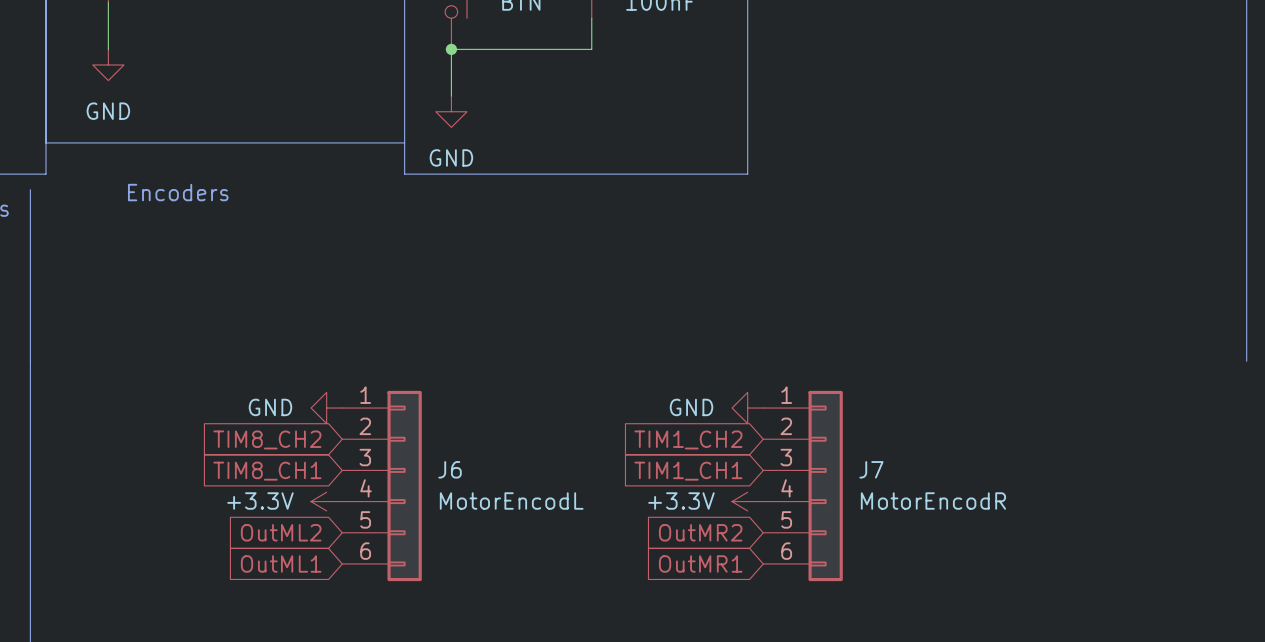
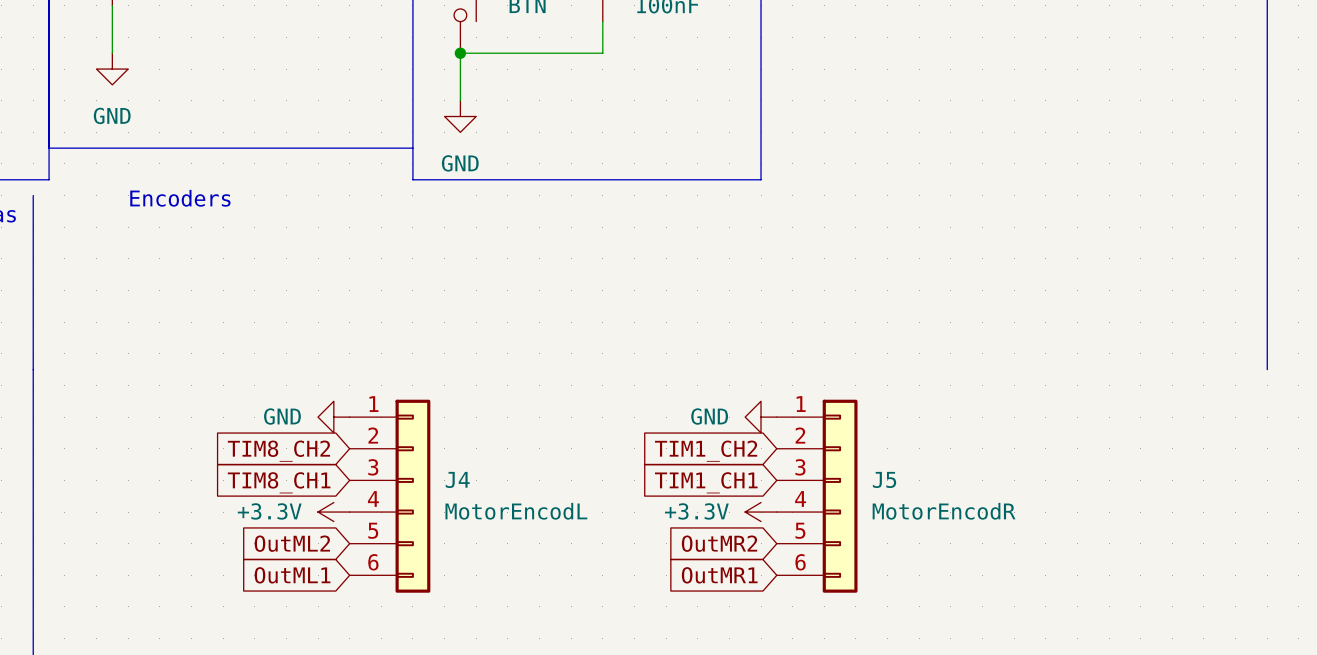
J6 name: J6 (450, 469) -> J4 (457, 479)
J7 name: J7 (871, 469) -> J5 (884, 479)

